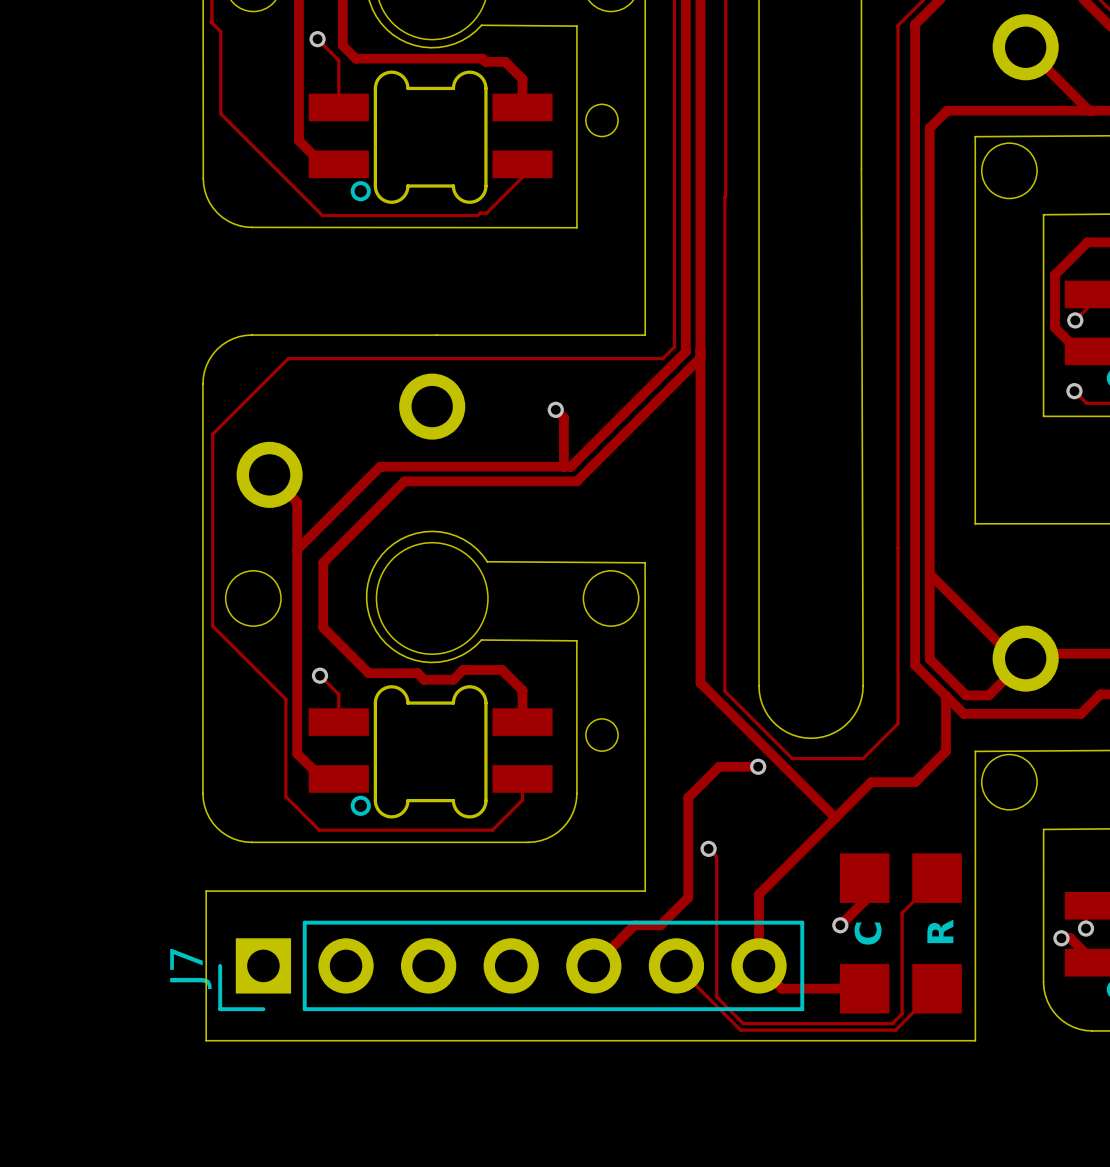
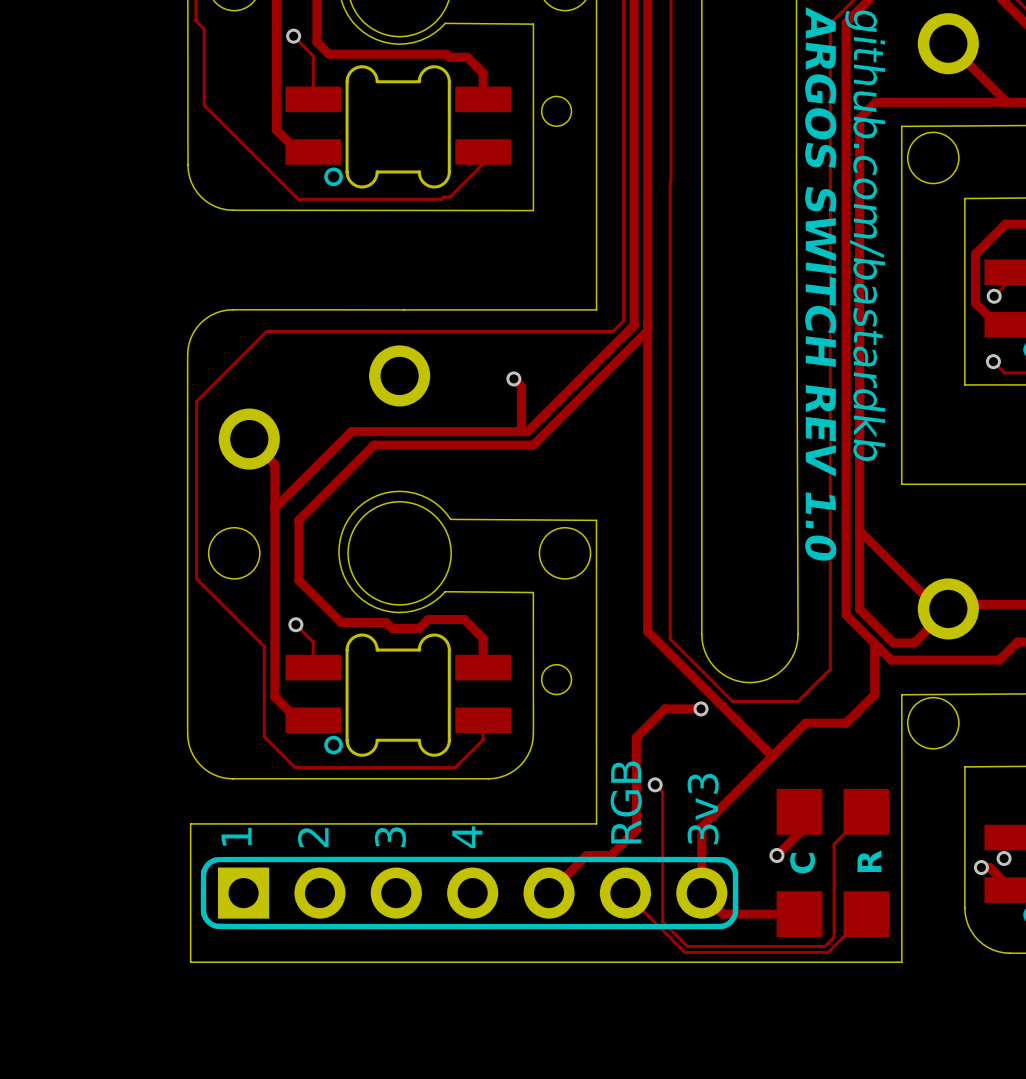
text: none -> github.com/bastardkb (865, 235)
text: none -> ARGOS SWITCH REV 1.0 (820, 284)
text: none -> RGB (626, 802)
text: none -> 3v3 (703, 809)
text: none -> 1 (236, 836)
text: none -> 2 (313, 837)
text: none -> 3 (390, 837)
text: none -> 4 (467, 837)
drawing: none -> [200, 856, 739, 930]
J7: (511, 965) -> none

